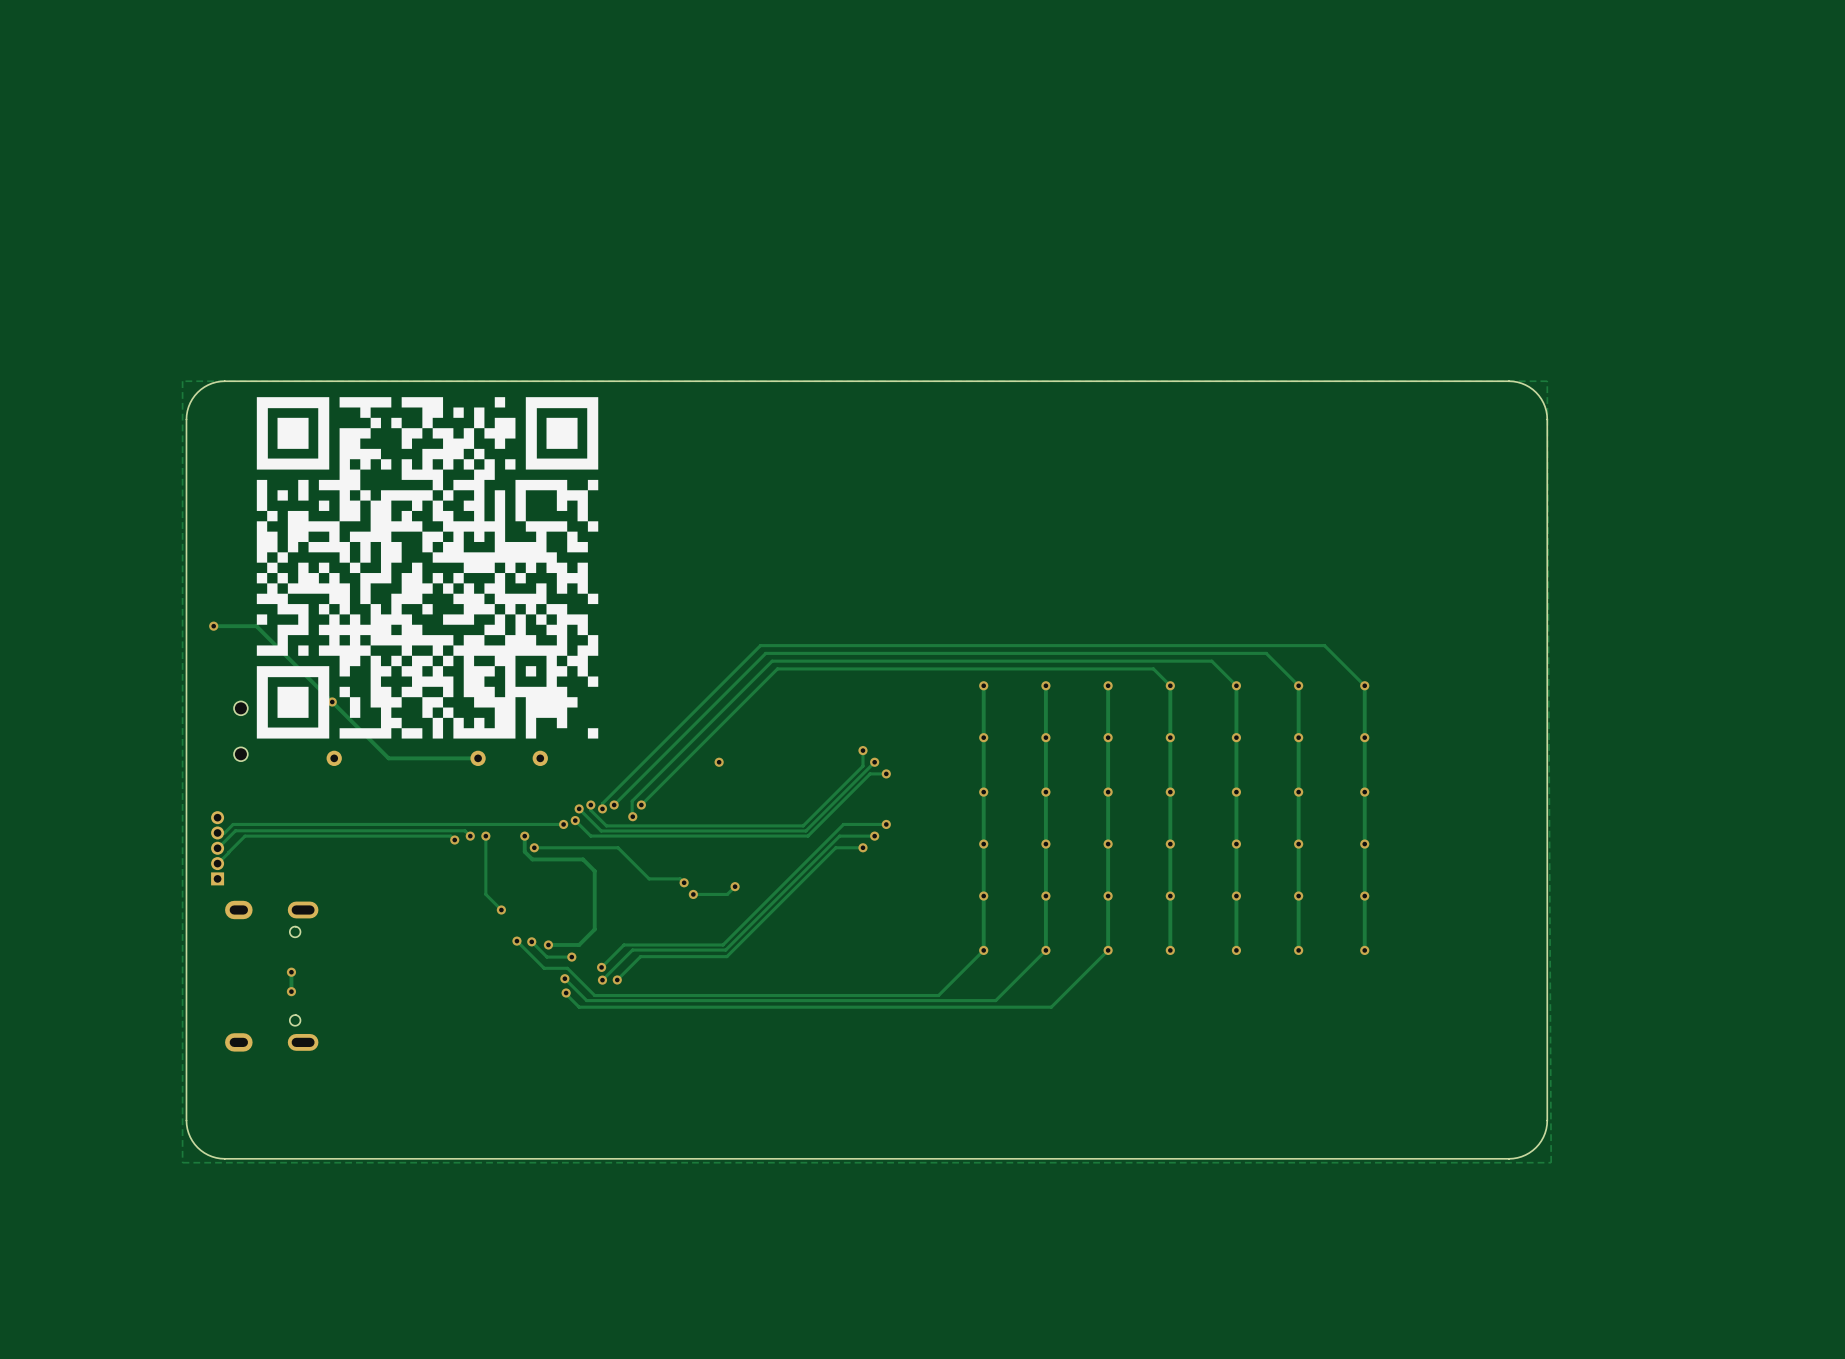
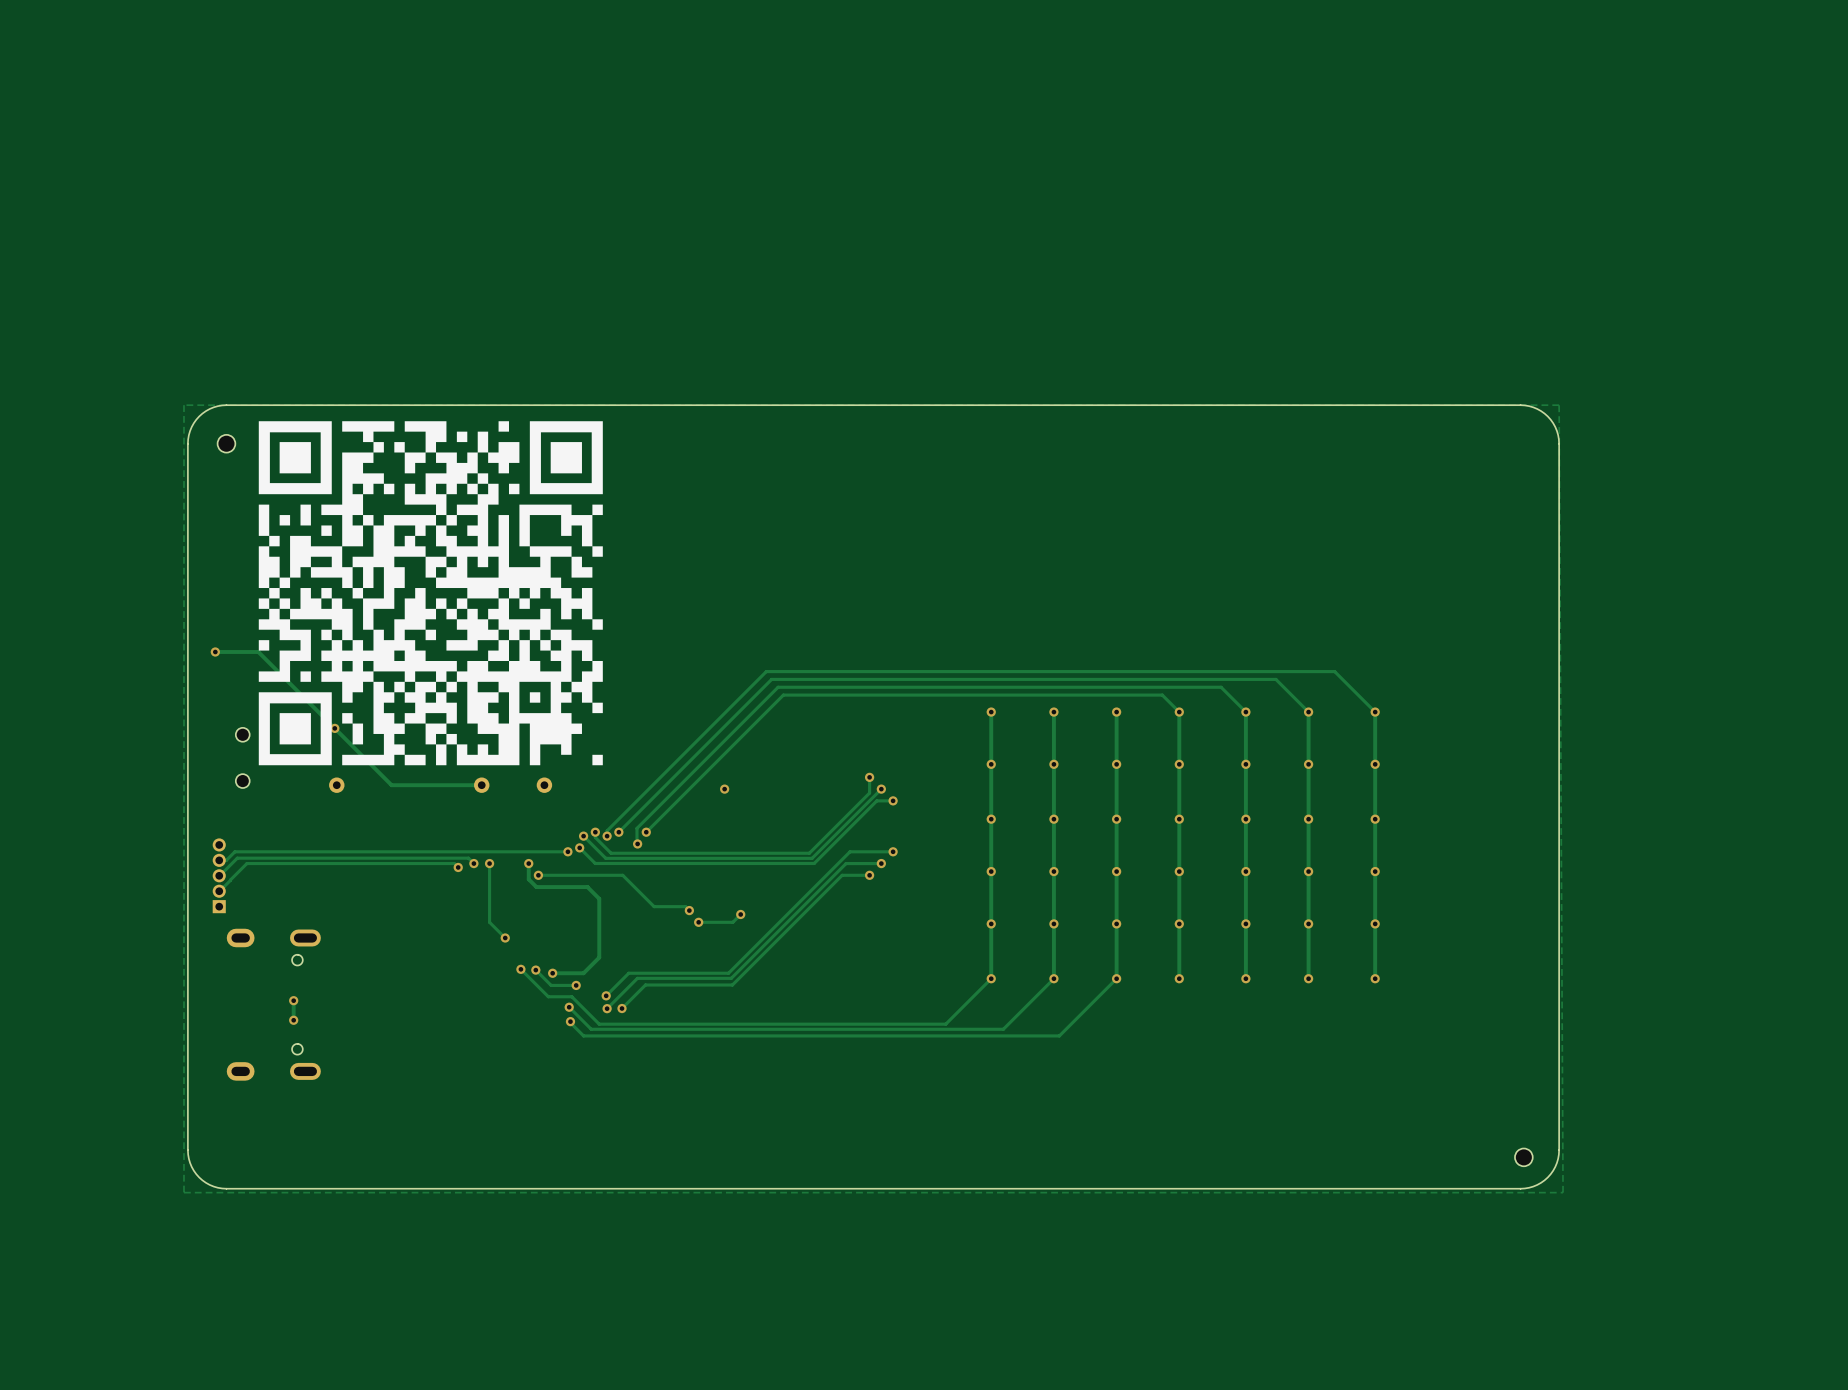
part: none -> (226, 443)
part: none -> (1523, 1157)

